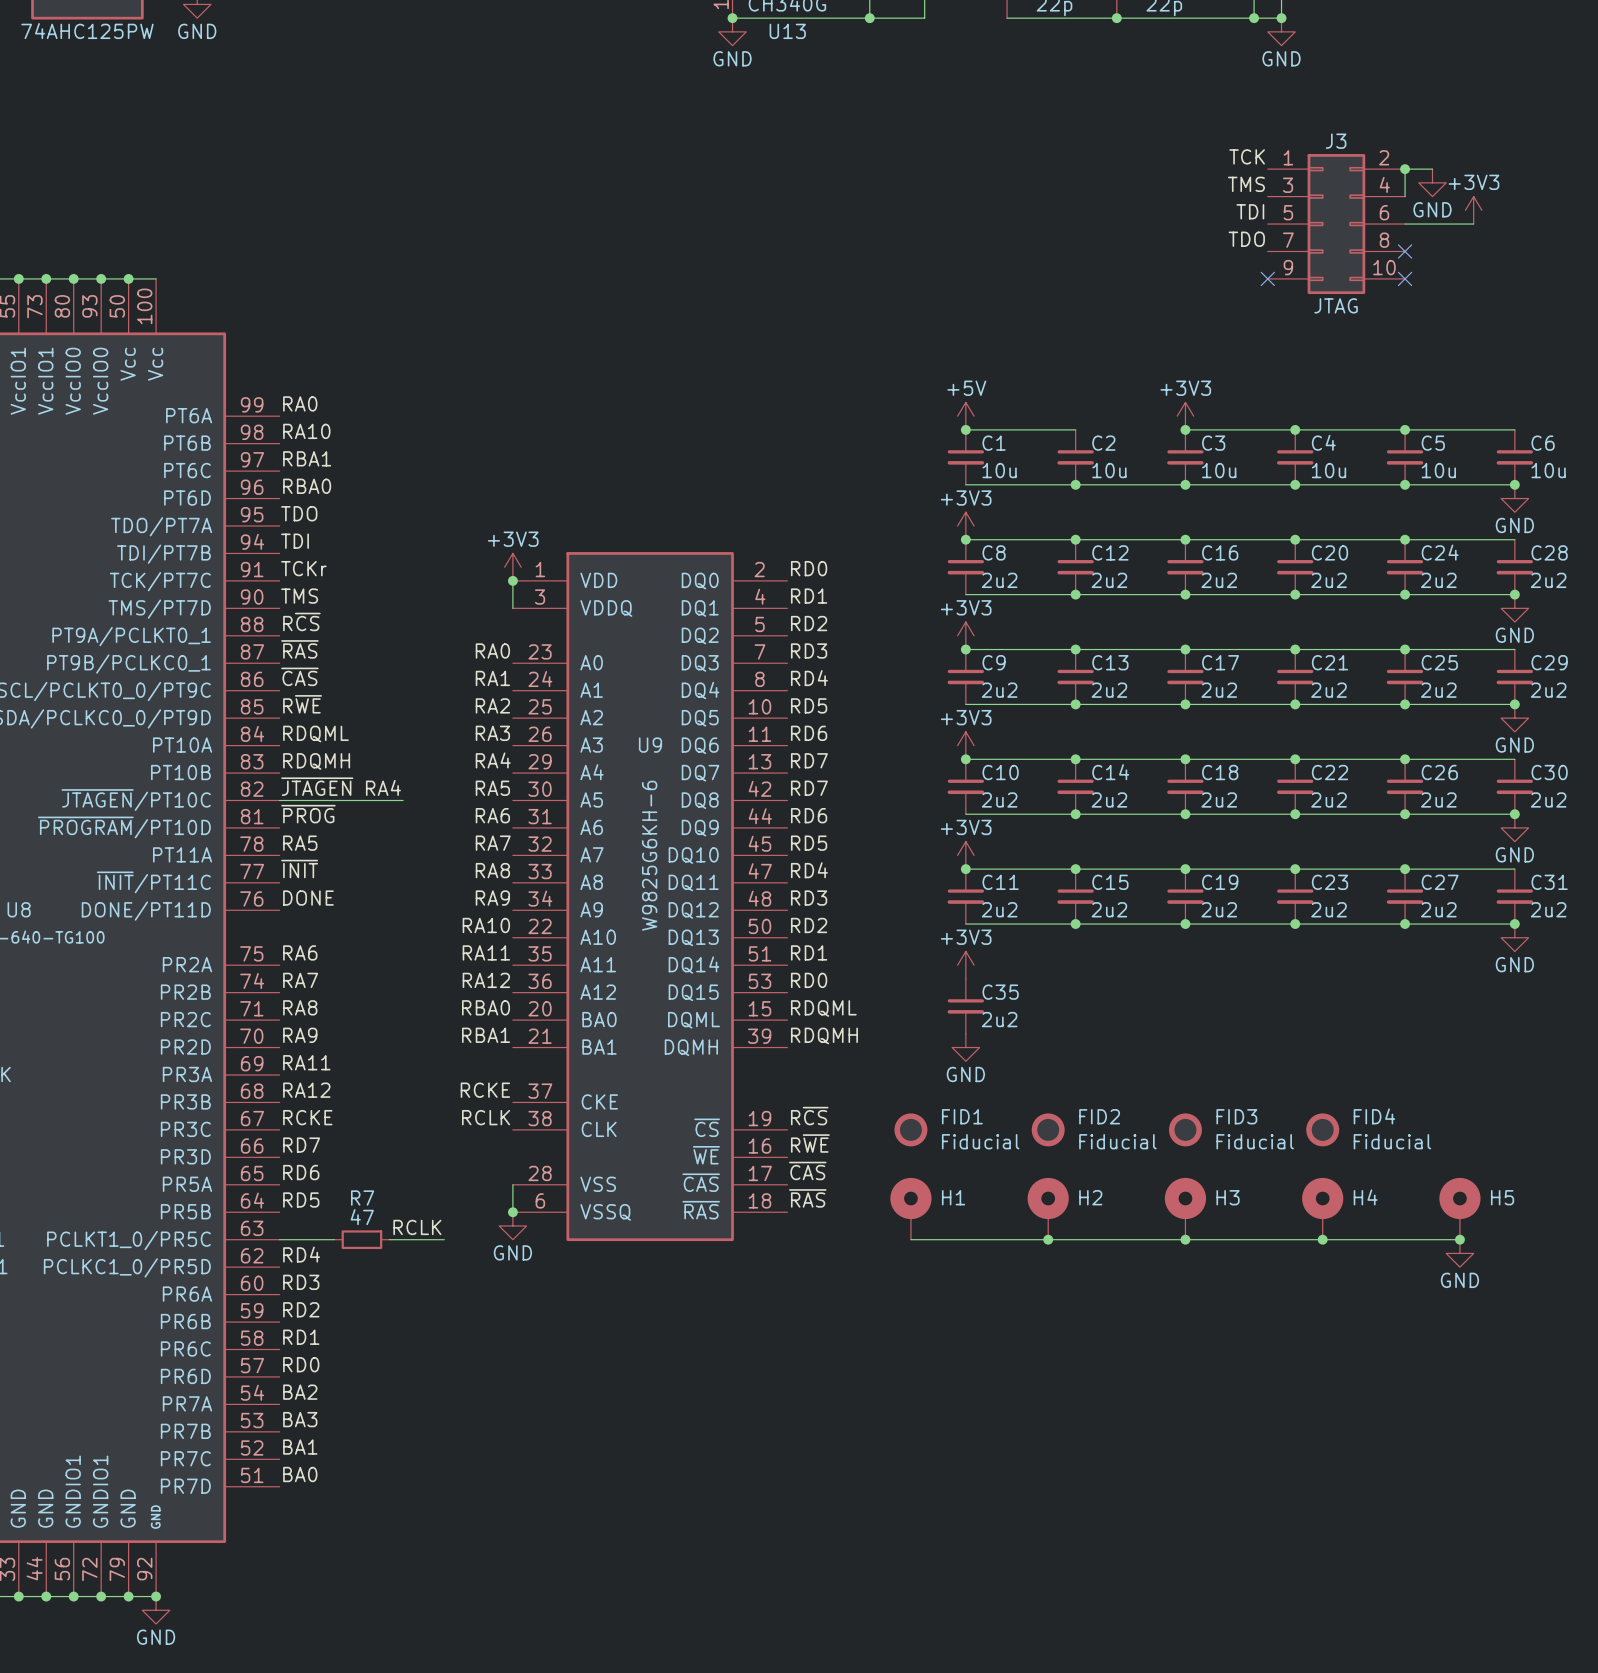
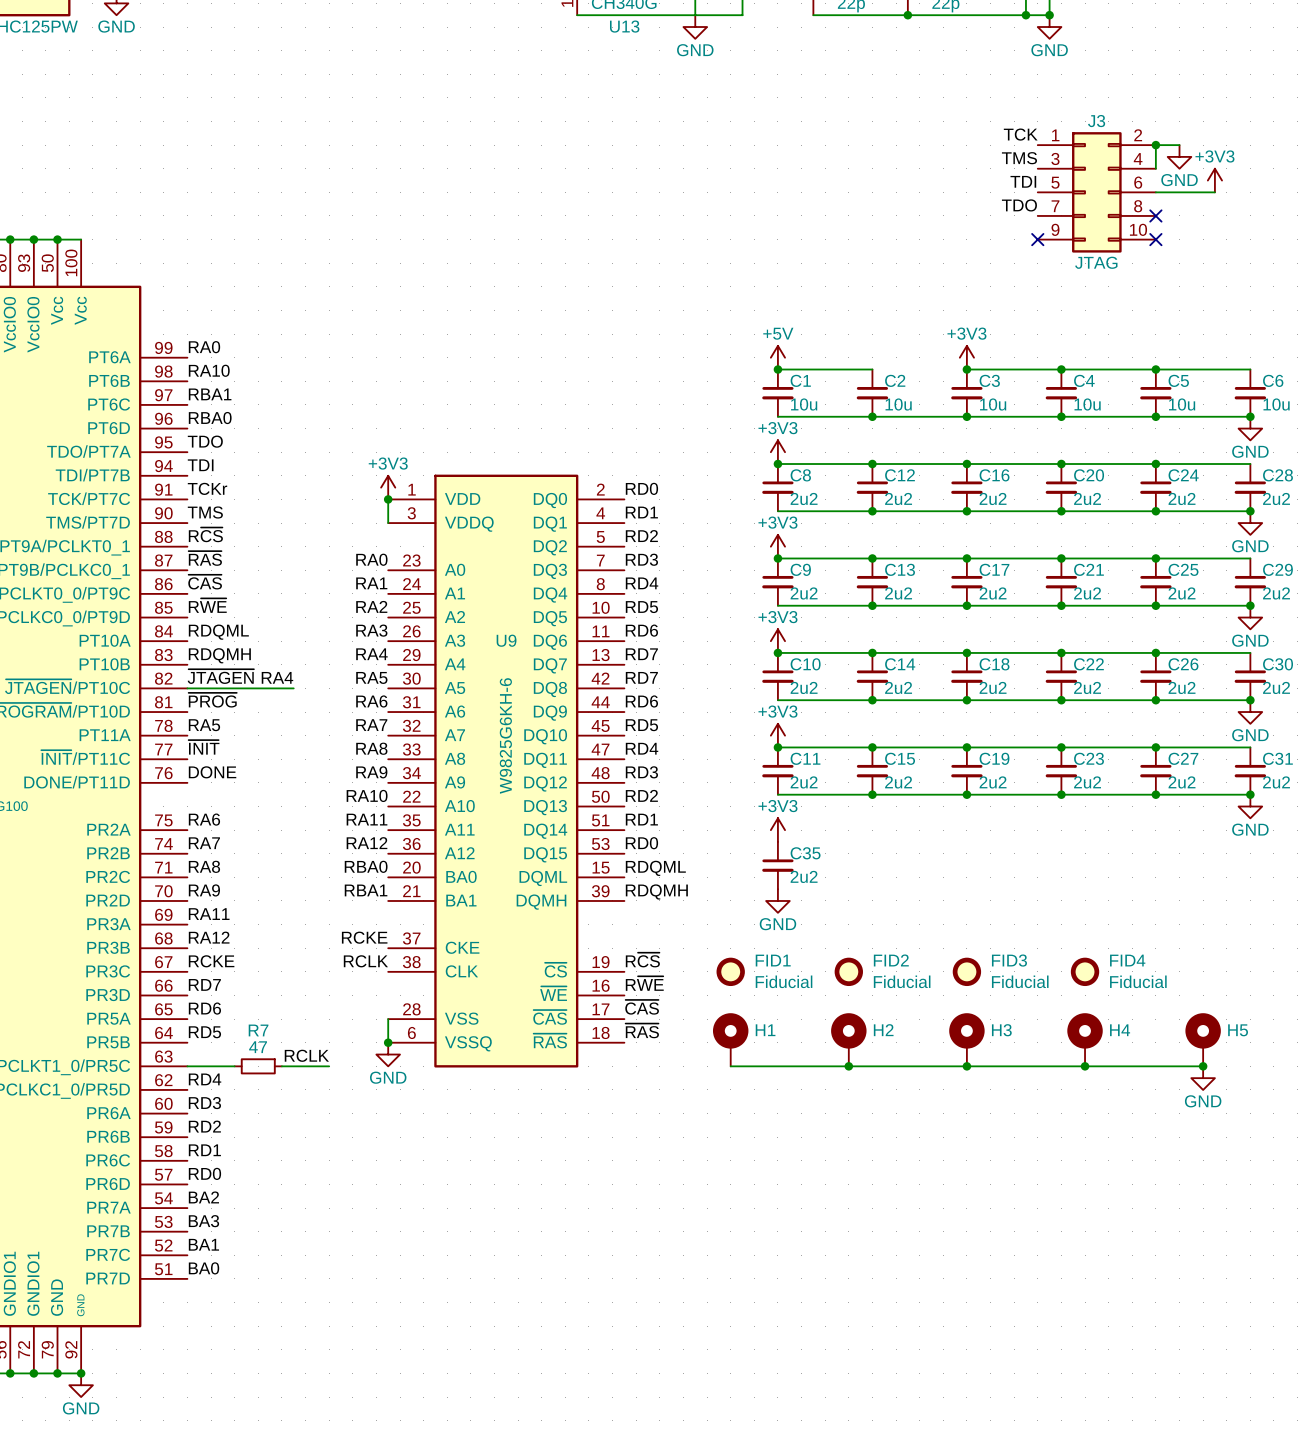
junction: (732, 18) -> none
junction: (869, 18) -> none
power symbol: GND (732, 31) -> none
power symbol: none -> GND (695, 27)

